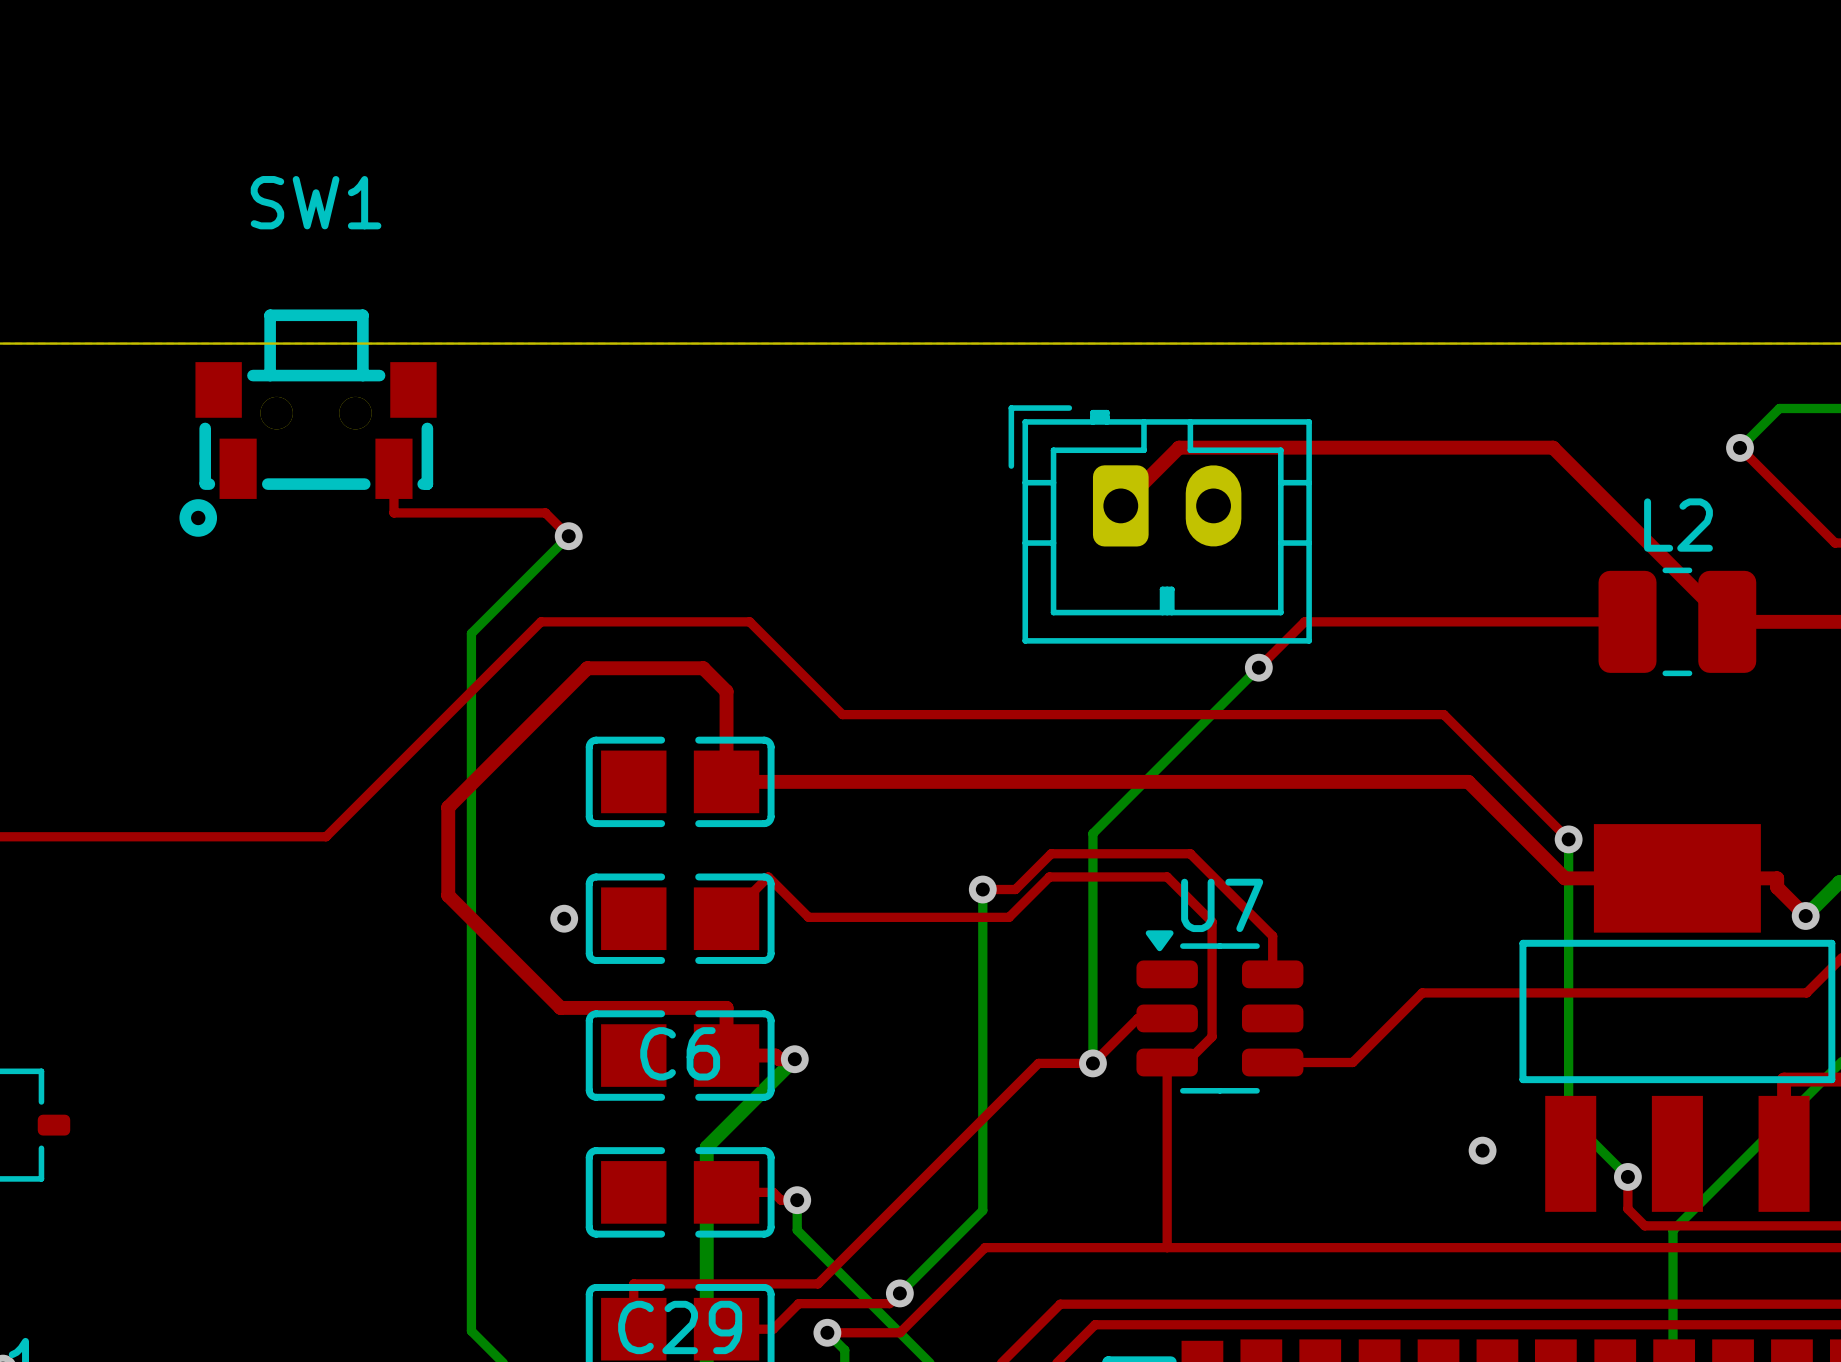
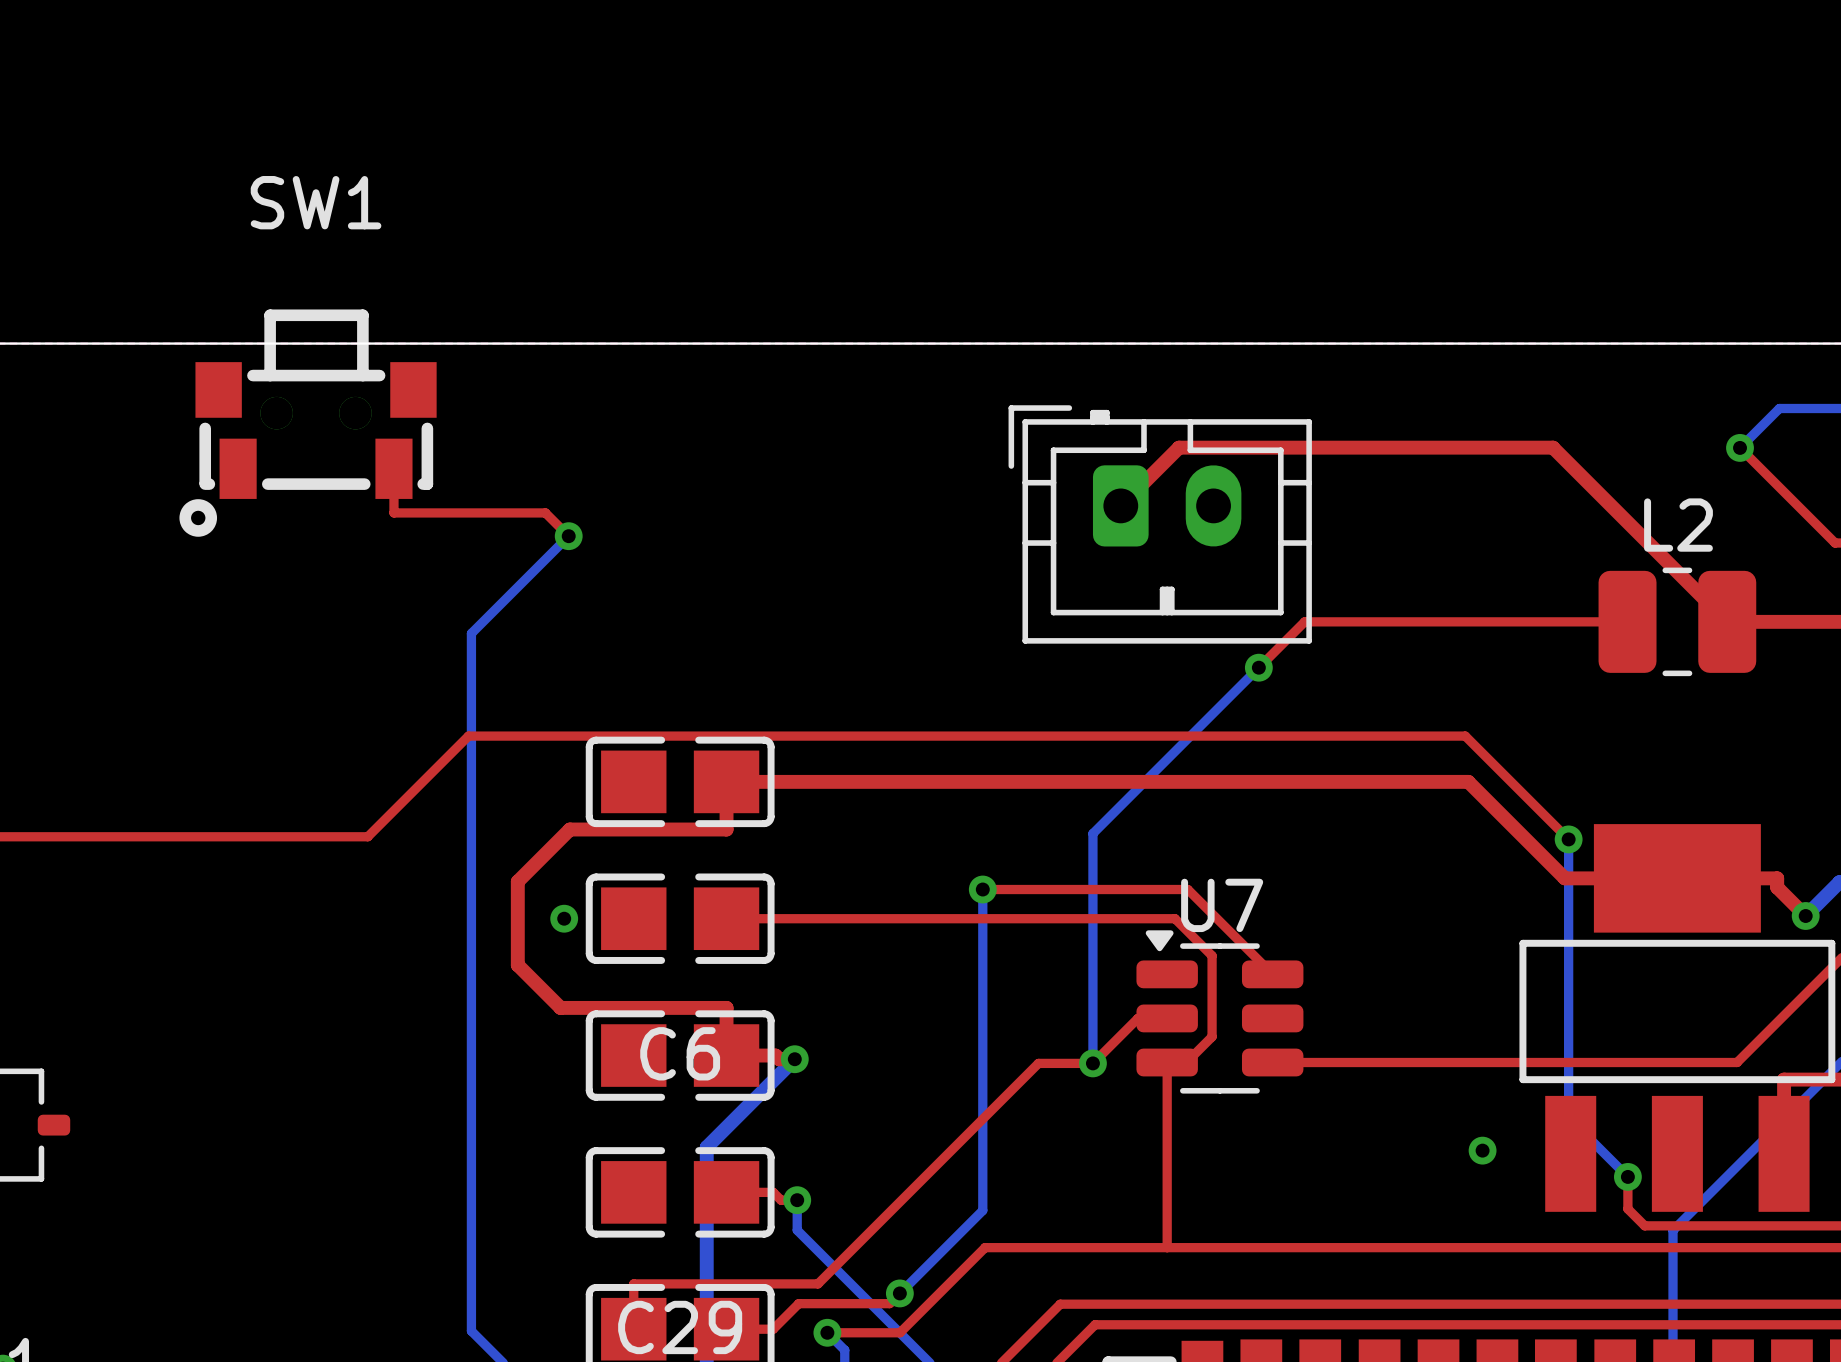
top track: (1465, 736) (1443, 714) (842, 714) (749, 621) (541, 621) (326, 836) -> (1465, 736) (468, 736) (367, 836) (326, 836)
top track: (726, 781) (726, 691) (703, 668) (587, 668) (448, 807) (448, 895) (517, 965) -> (726, 781) (726, 829) (569, 829) (517, 881) (517, 965)
top track: (1015, 889) (1051, 853) (1190, 853) (1272, 936) (1272, 974) -> (1015, 889) (1187, 889) (1272, 974)
top track: (726, 918) (768, 876) (808, 917) (1009, 917) (1049, 876) (1167, 876) (1212, 921) (1212, 955) -> (726, 918) (1175, 918) (1212, 955)
top track: (1806, 992) (1422, 992) (1352, 1062) -> (1806, 992) (1737, 1062) (1352, 1062)

